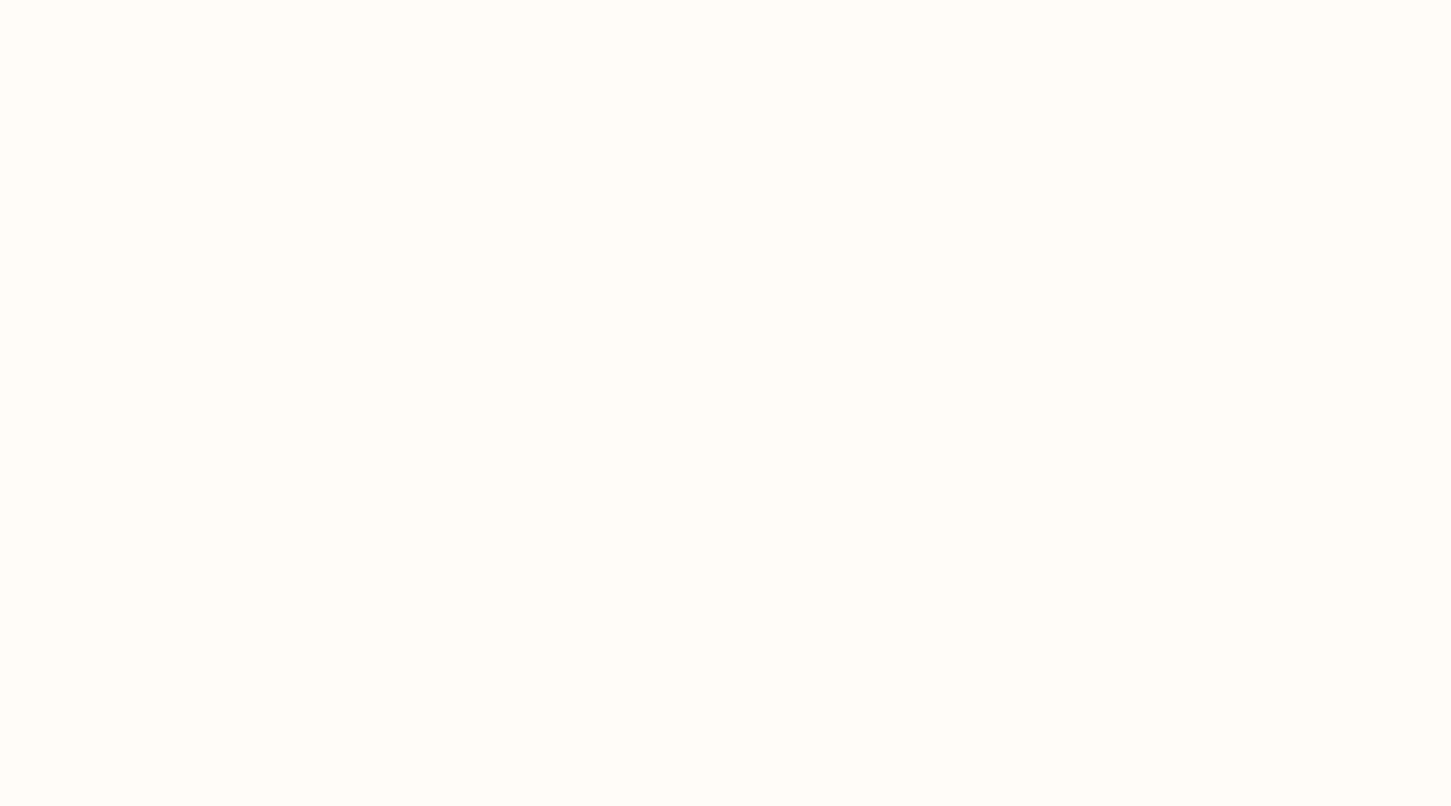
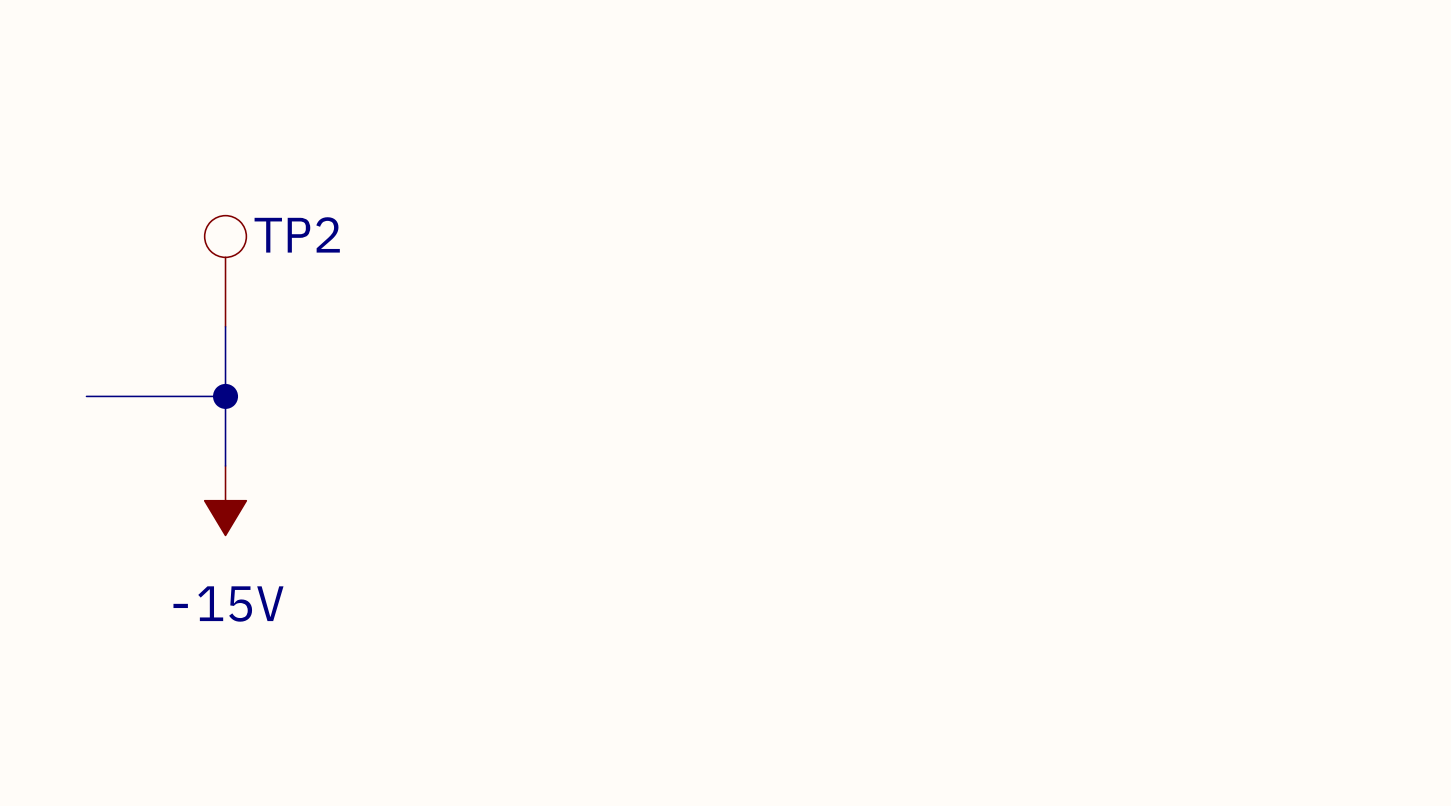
TP2: none -> (225, 271)
wire: none -> (225, 326) (225, 465)
wire: none -> (86, 396) (225, 396)
junction: none -> (225, 396)
power symbol: none -> -15V (225, 500)

